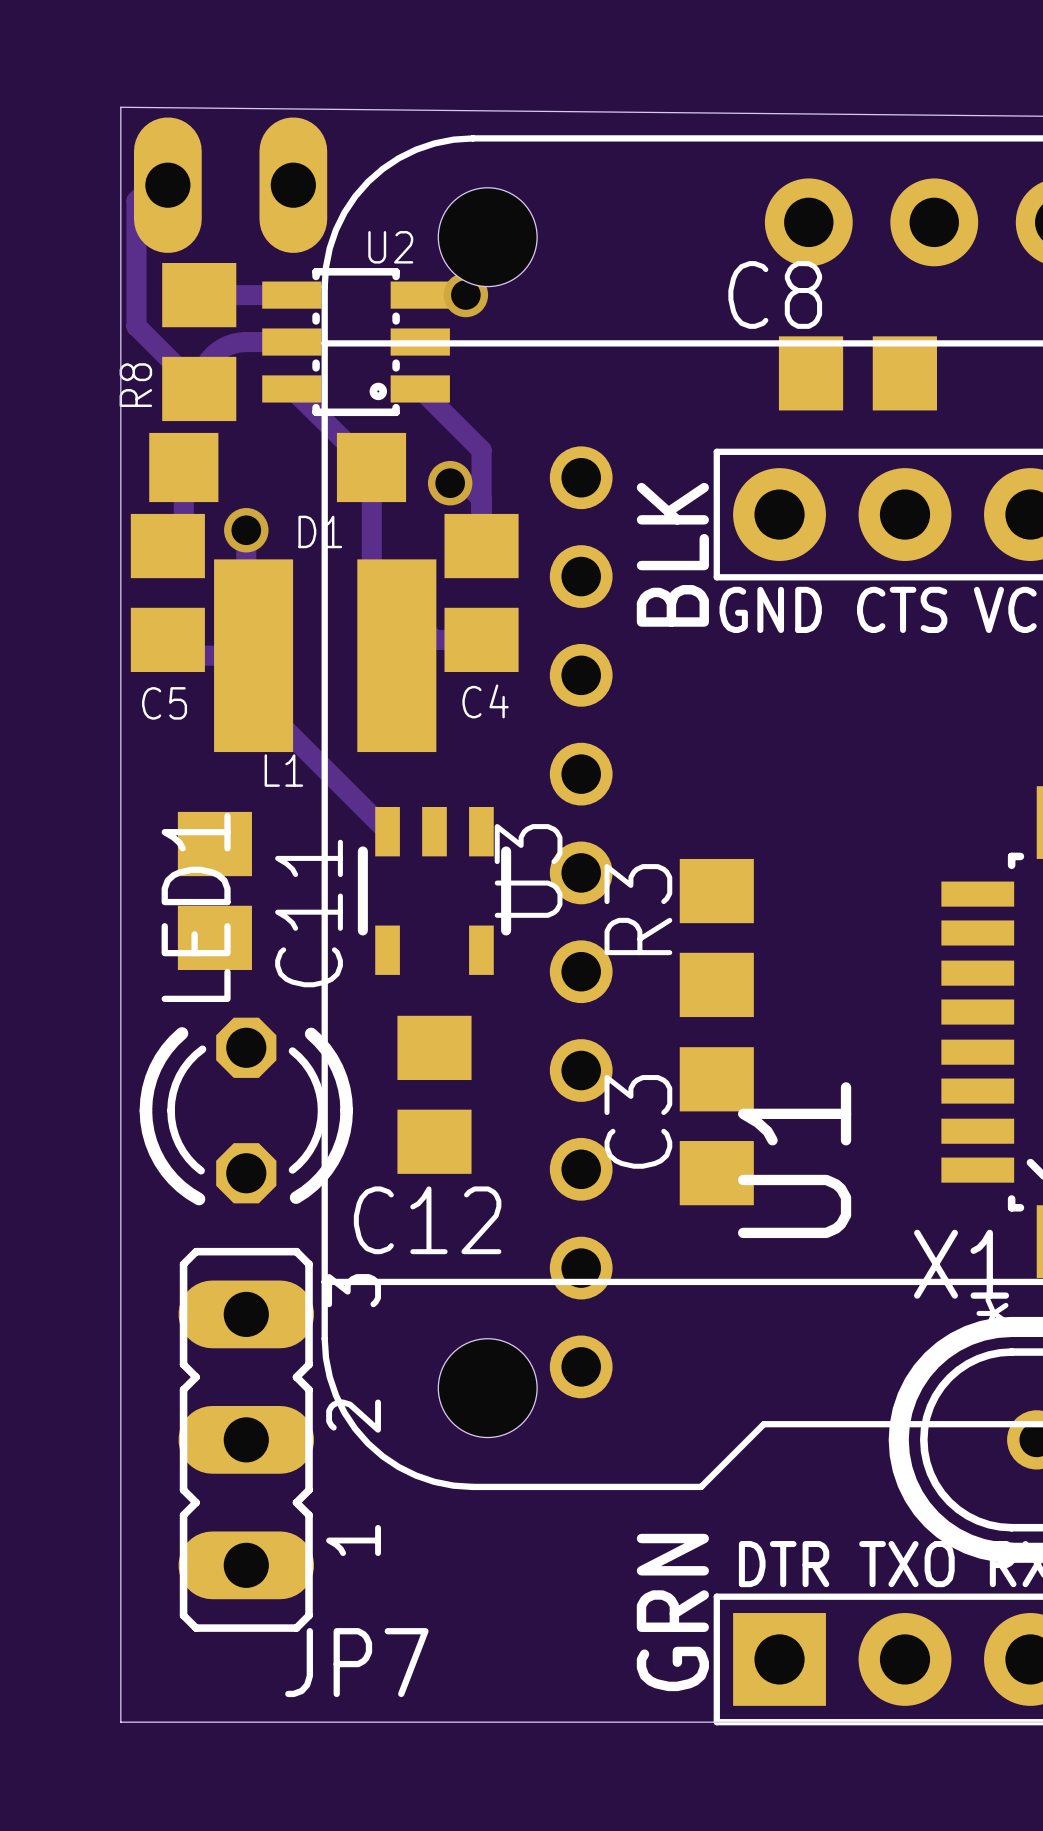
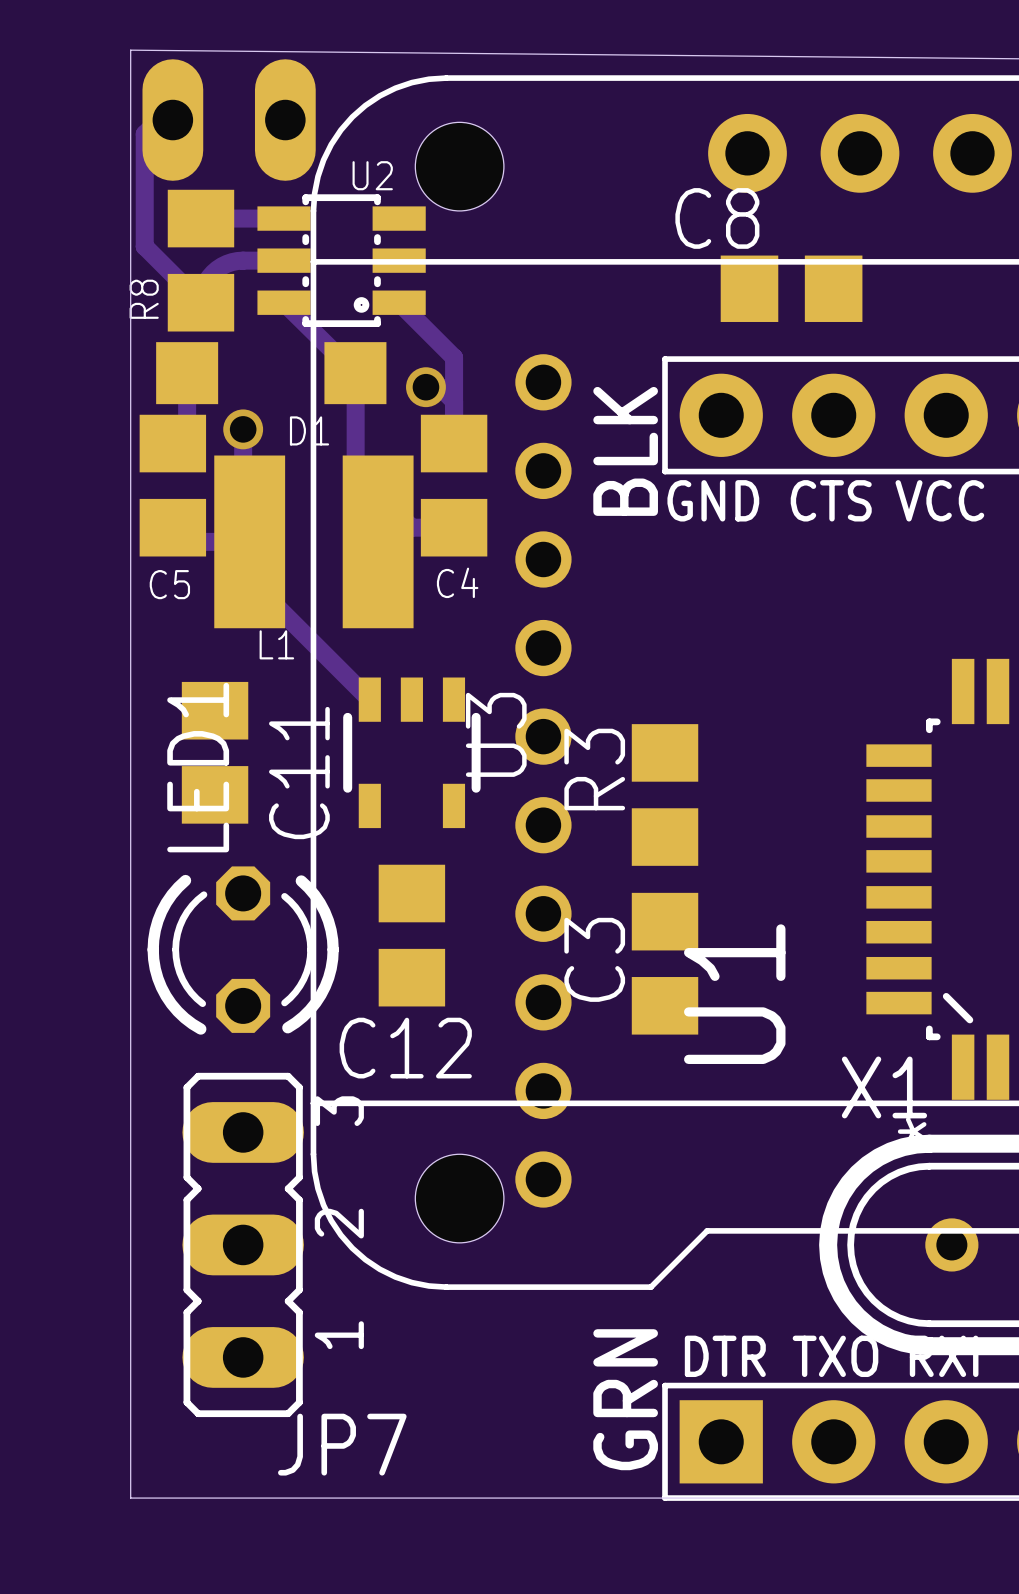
via: (465, 294) -> none

